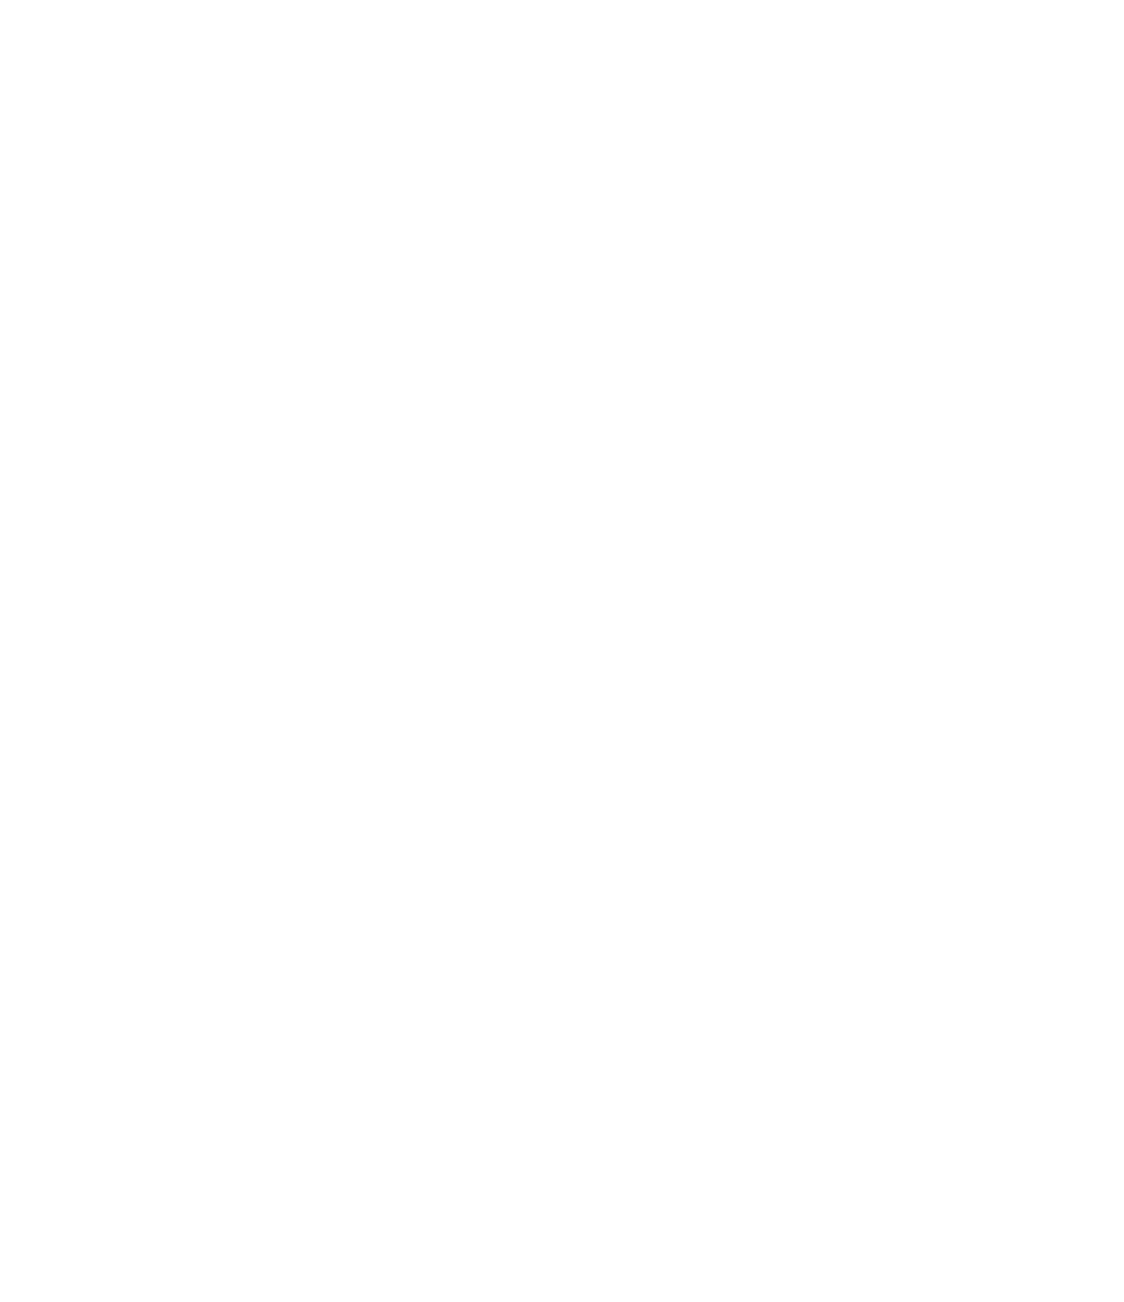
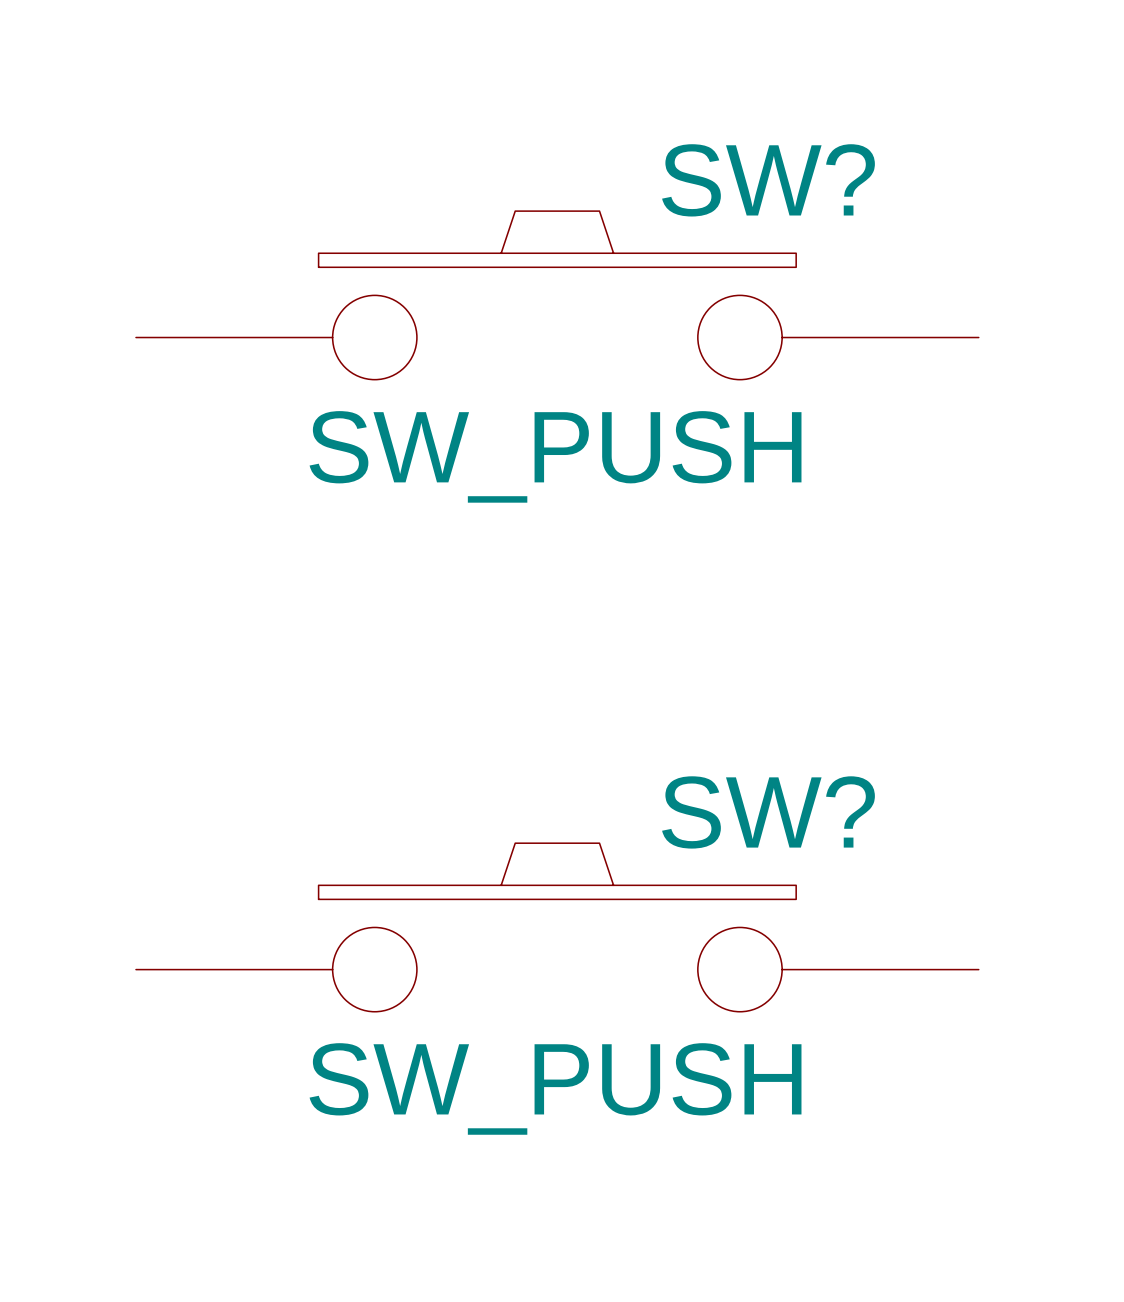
SW?: none -> SW_PUSH (557, 295)
SW?: none -> SW_PUSH (557, 927)

